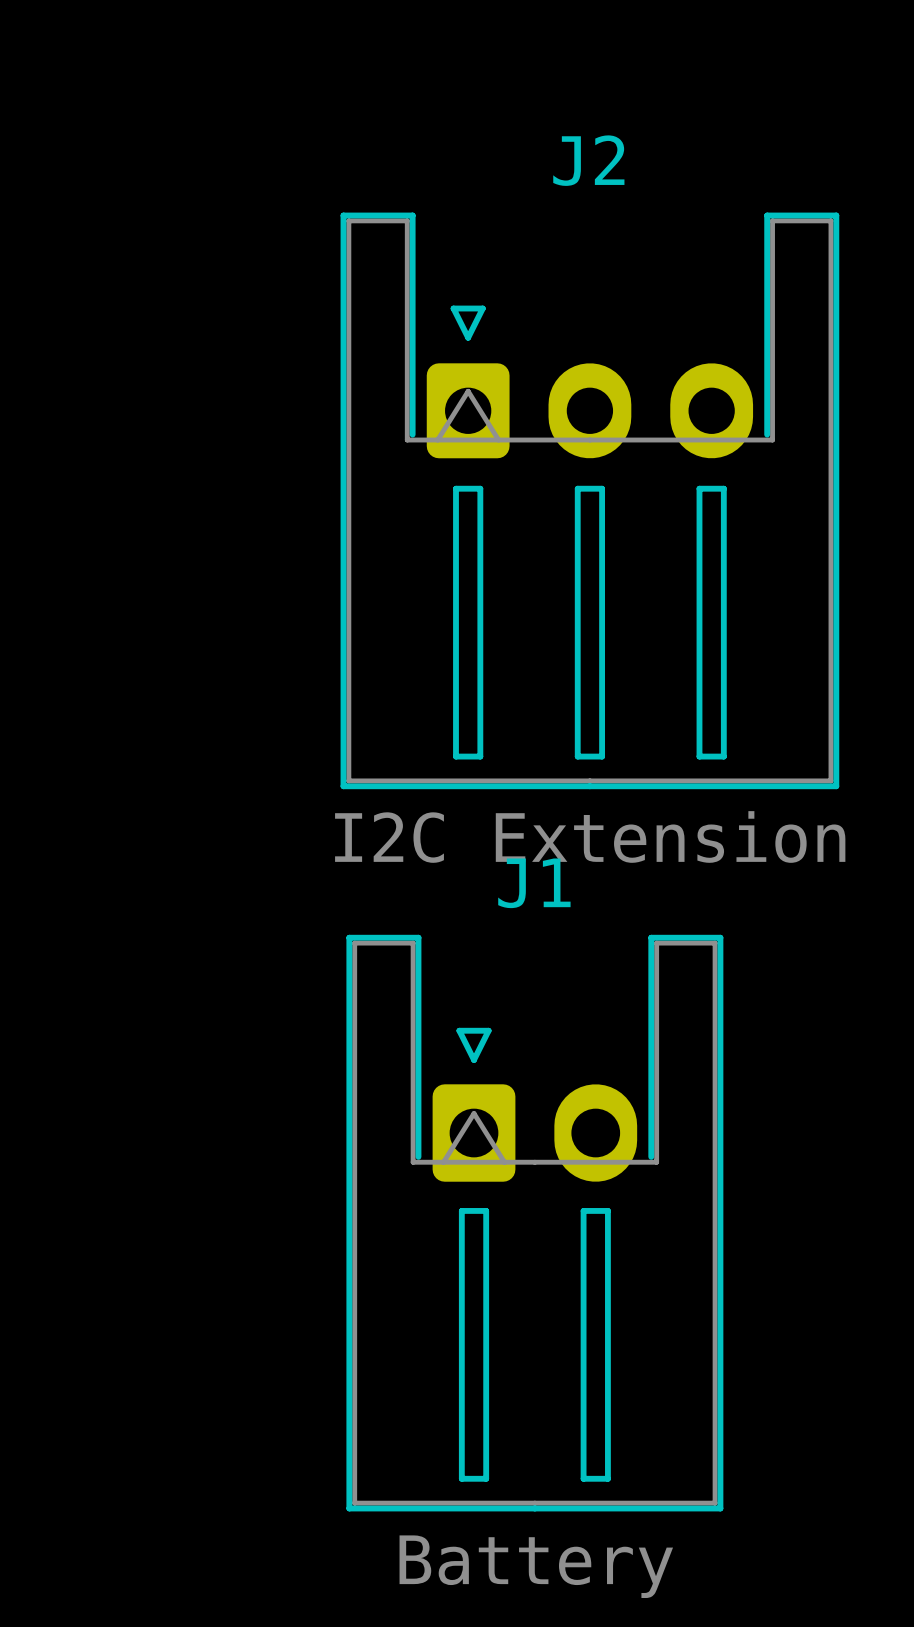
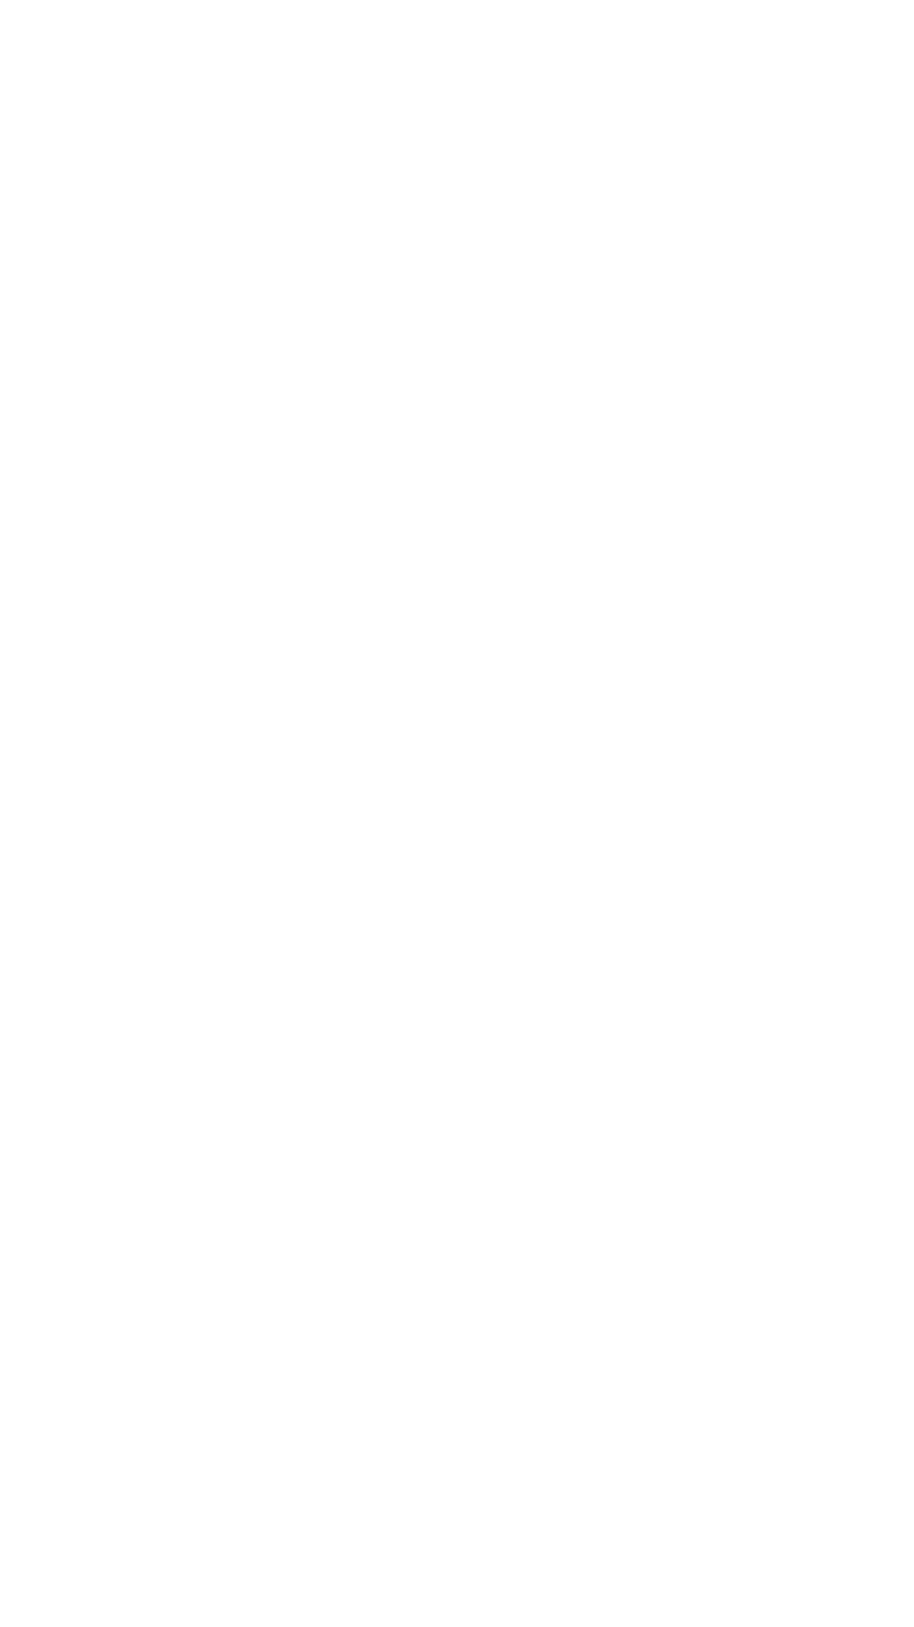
J2: I2C Extension (589, 500) -> none
J1: Battery (534, 1223) -> none

